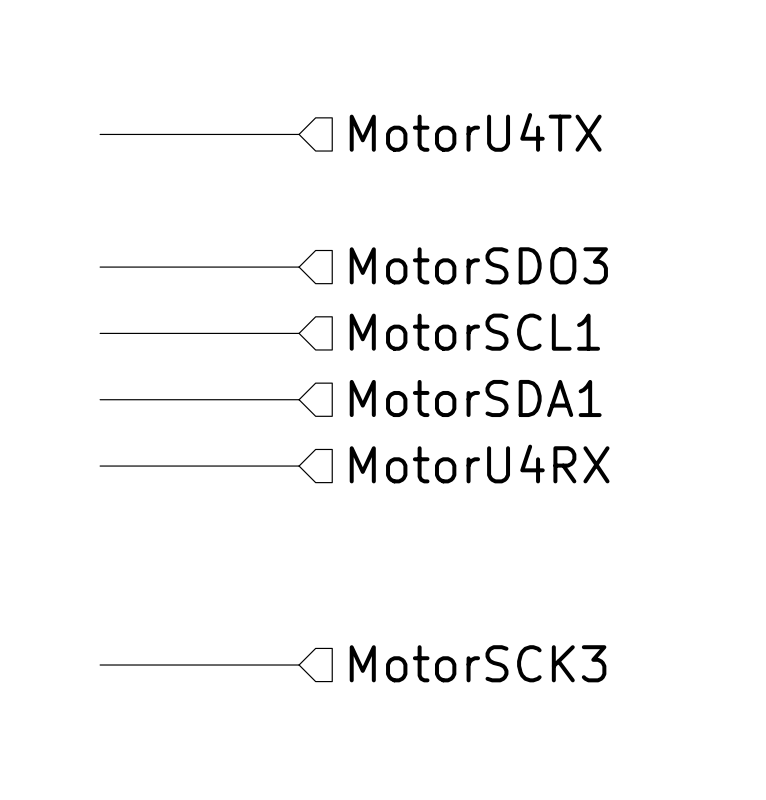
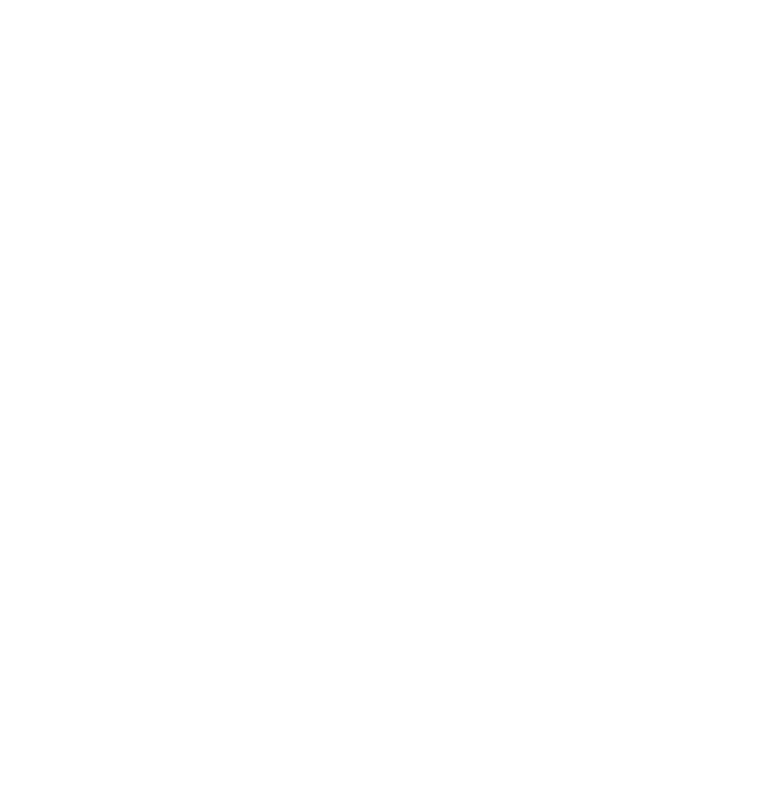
hierarchical label: MotorU4TX (475, 132) -> none
wire: (100, 134) (299, 134) -> none
hierarchical label: MotorSDO3 (478, 265) -> none
wire: (100, 267) (299, 267) -> none
hierarchical label: MotorSCL1 (474, 332) -> none
wire: (100, 333) (299, 333) -> none
hierarchical label: MotorSDA1 (475, 398) -> none
wire: (100, 399) (299, 399) -> none
hierarchical label: MotorU4RX (479, 464) -> none
wire: (100, 466) (299, 466) -> none
hierarchical label: MotorSCK3 (478, 663) -> none
wire: (100, 665) (299, 665) -> none

